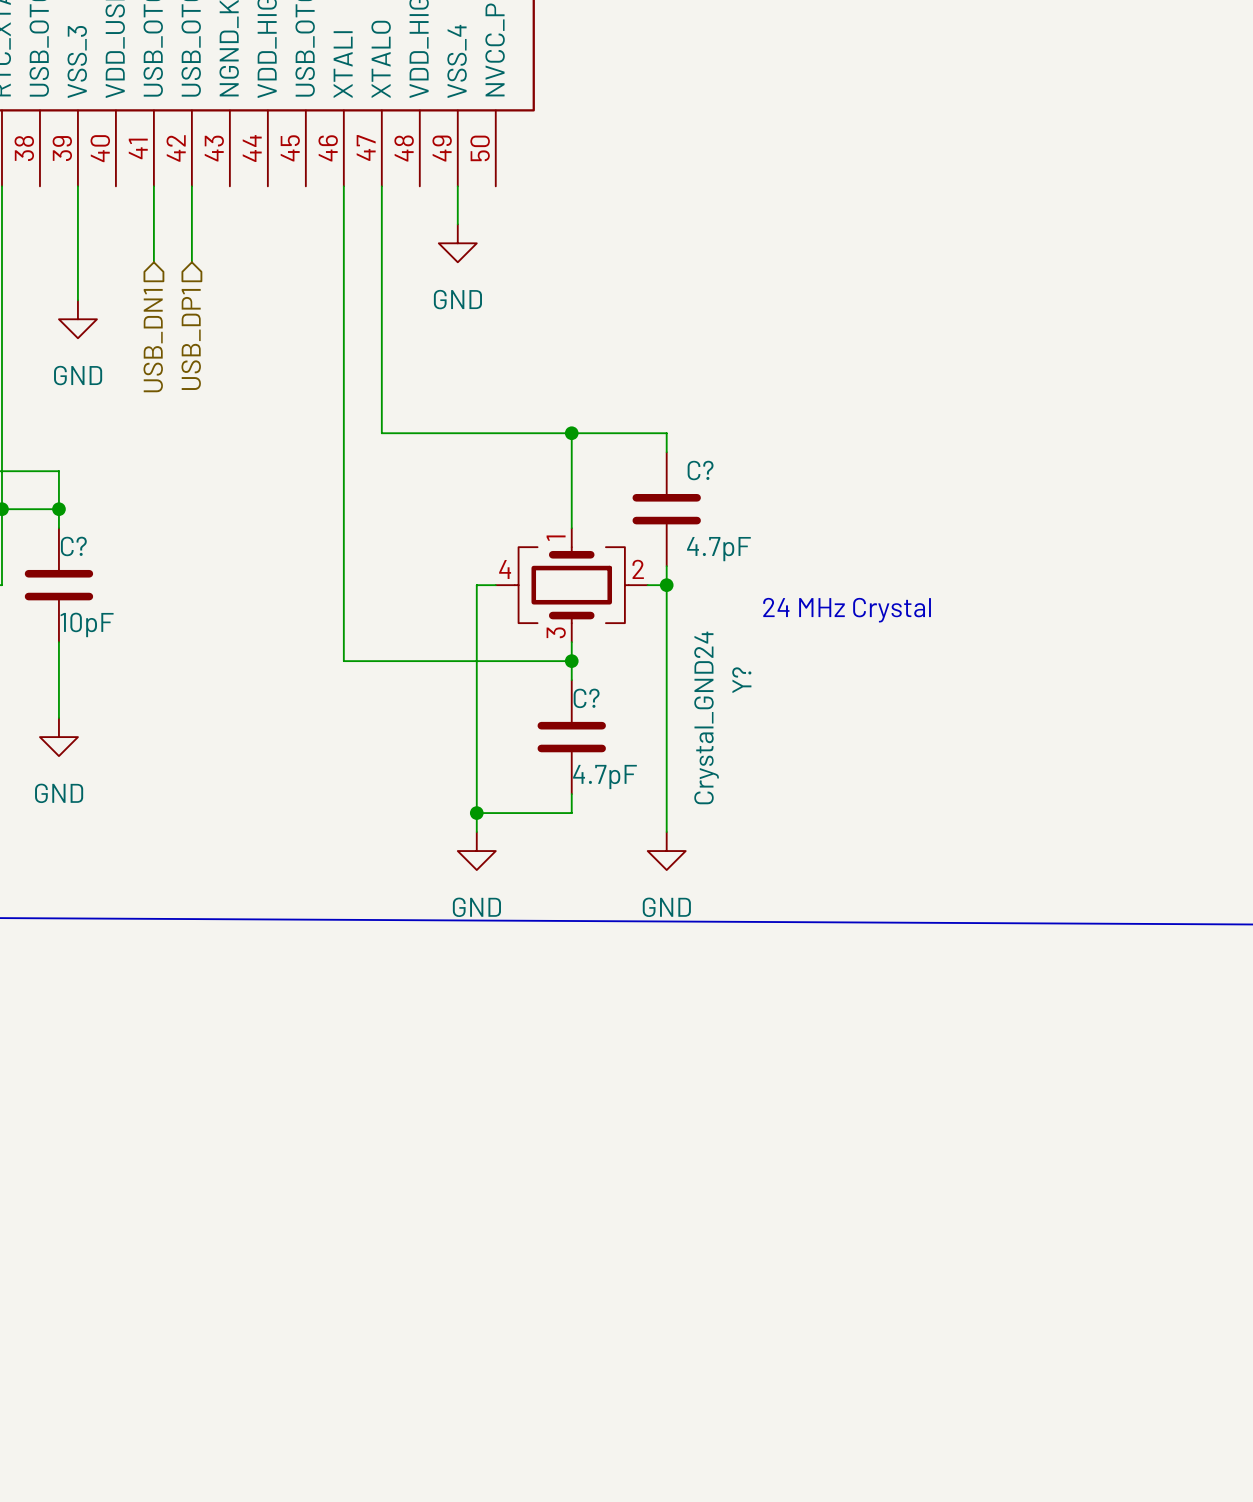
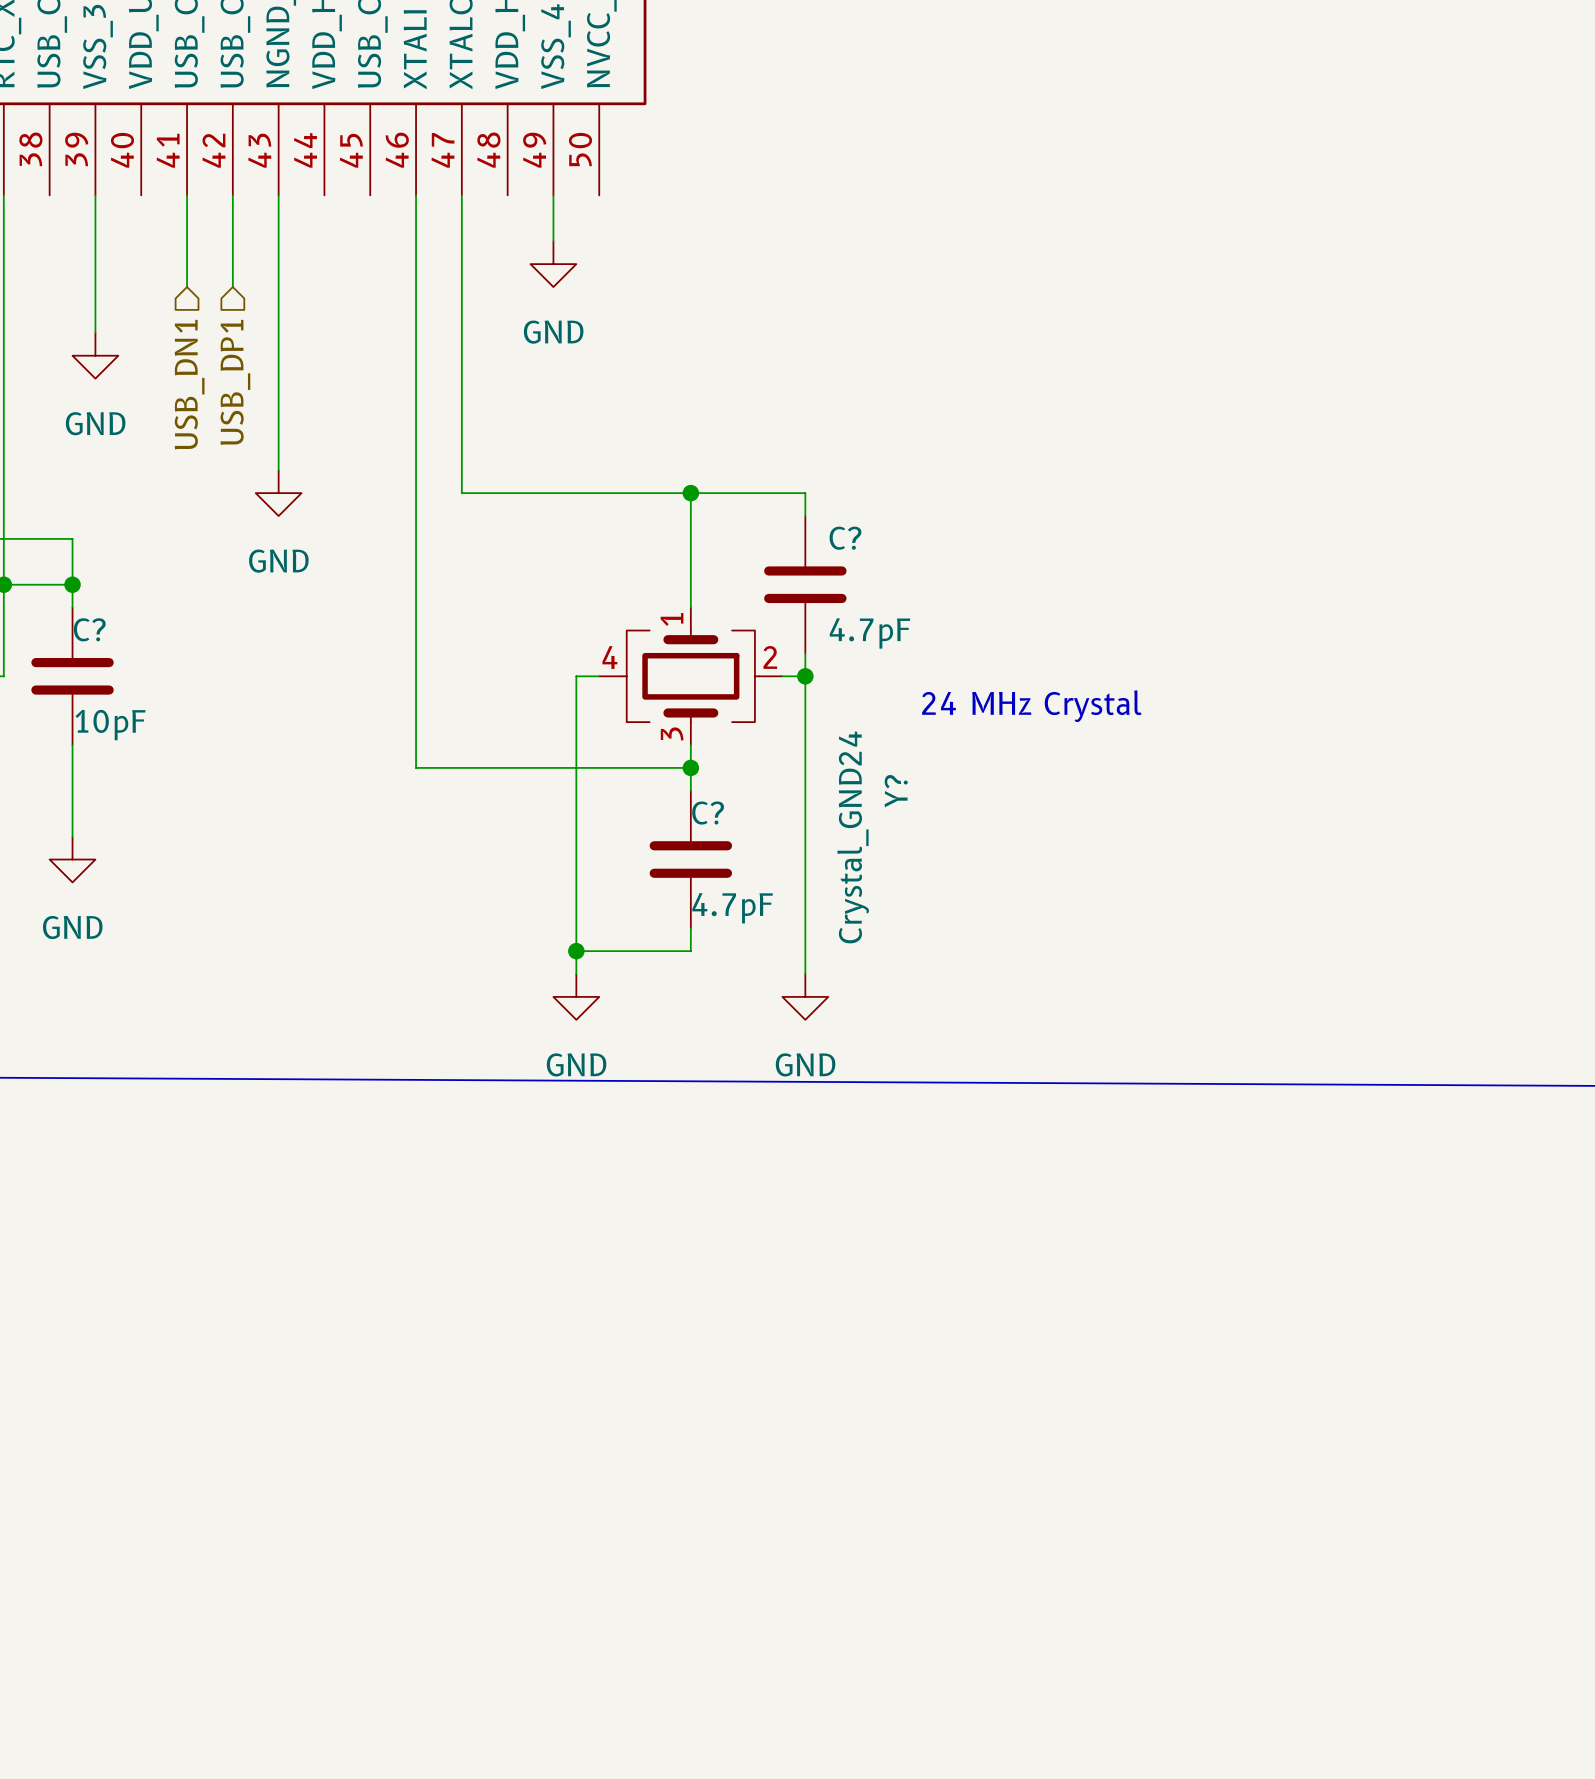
wire: none -> (278, 195) (278, 470)
power symbol: none -> GND (278, 493)

